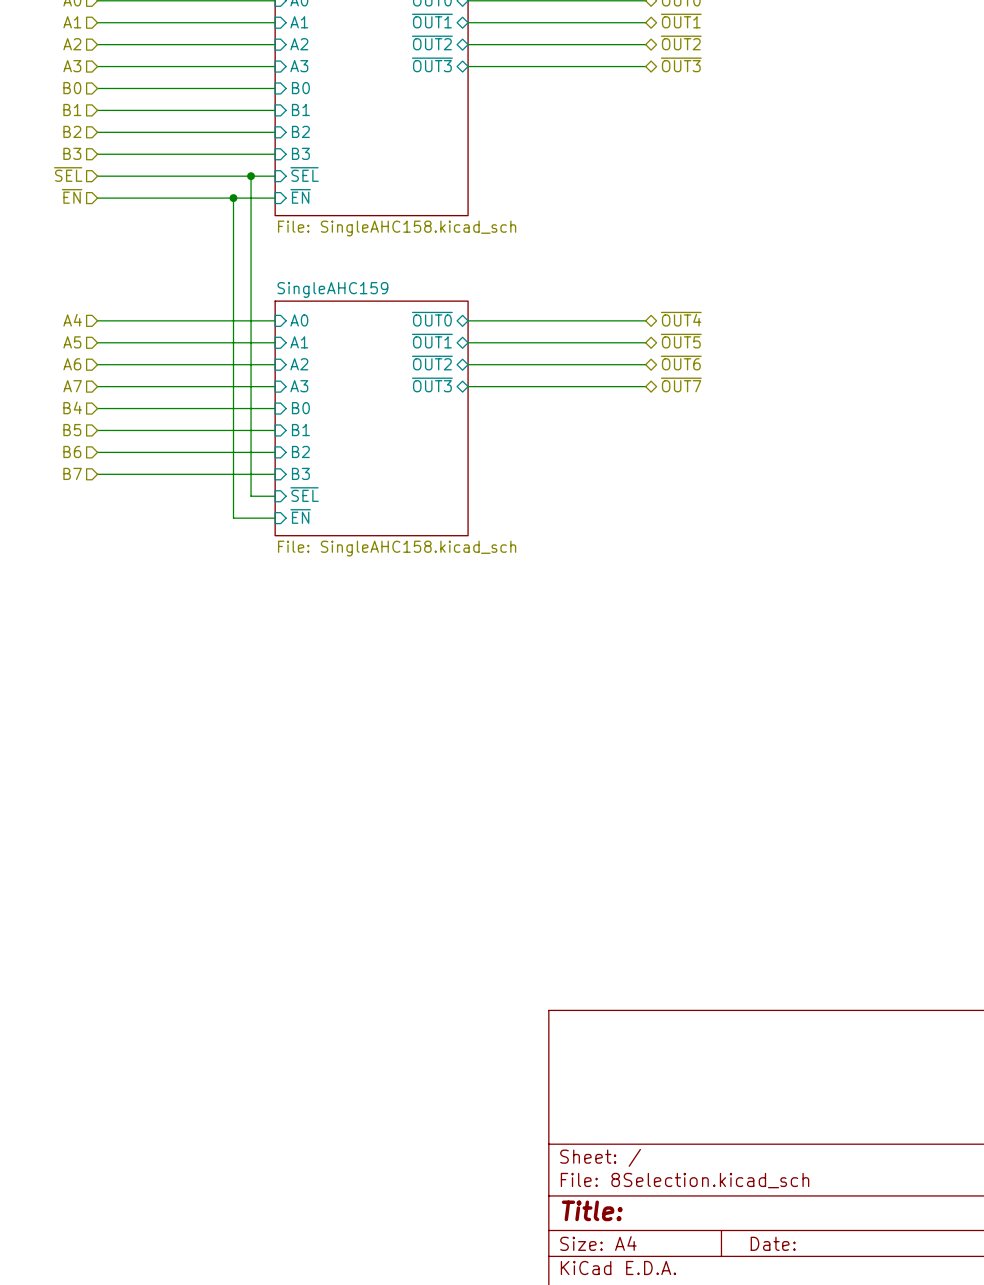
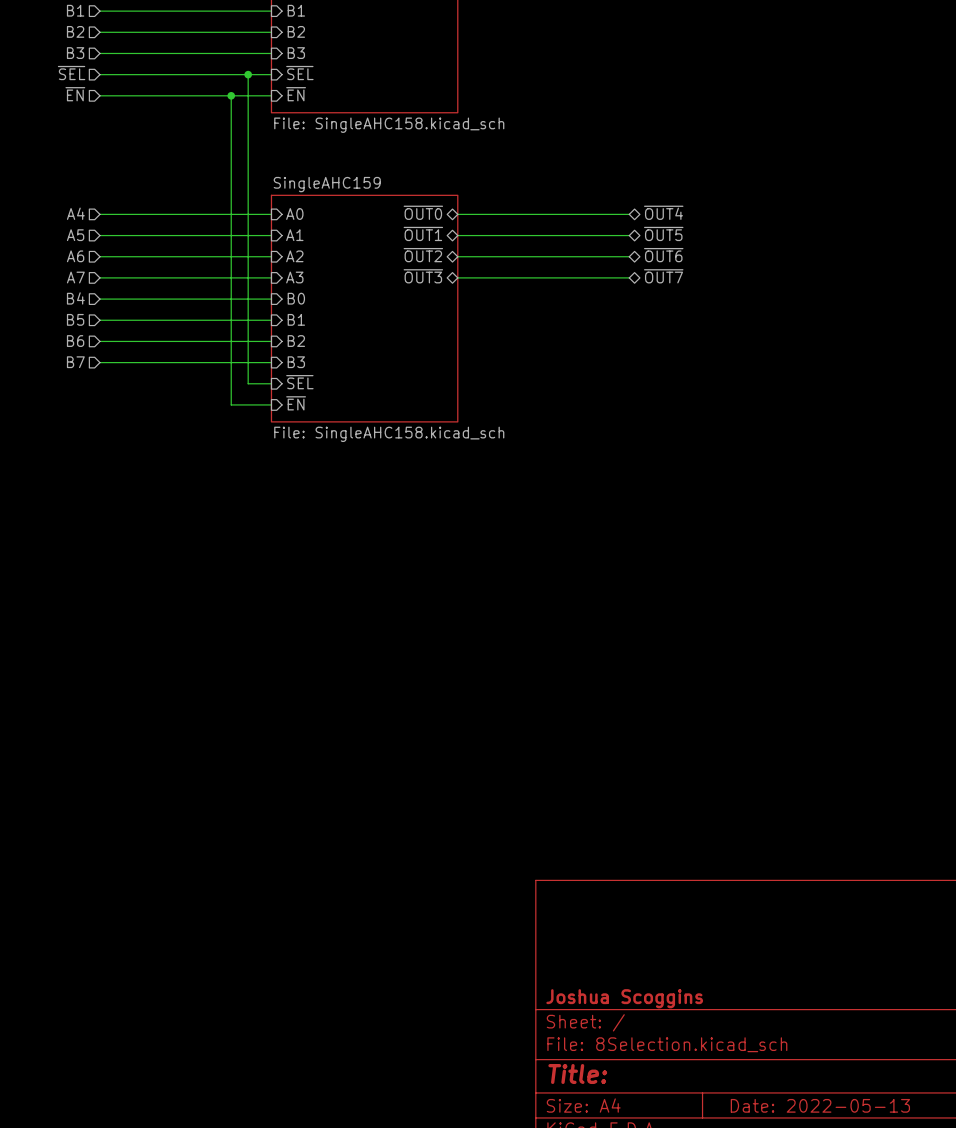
title block: none -> Joshua Scoggins (624, 998)
title block: Date: (773, 1243) -> Date: 2022-05-13 (820, 1105)

